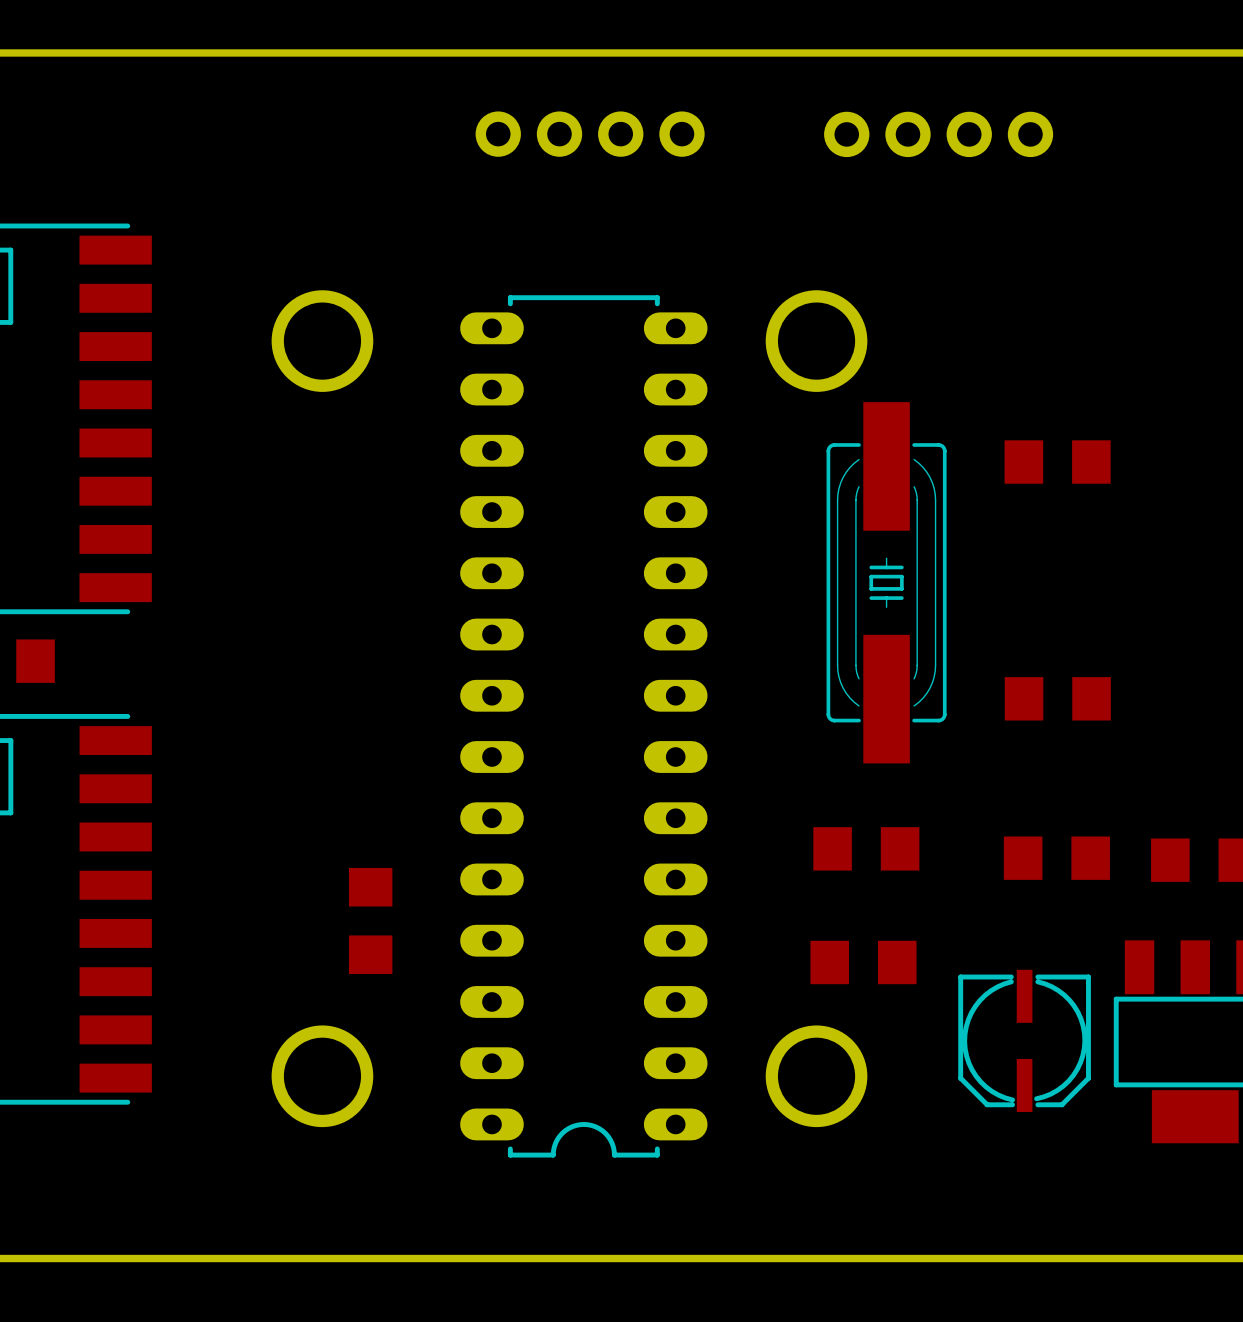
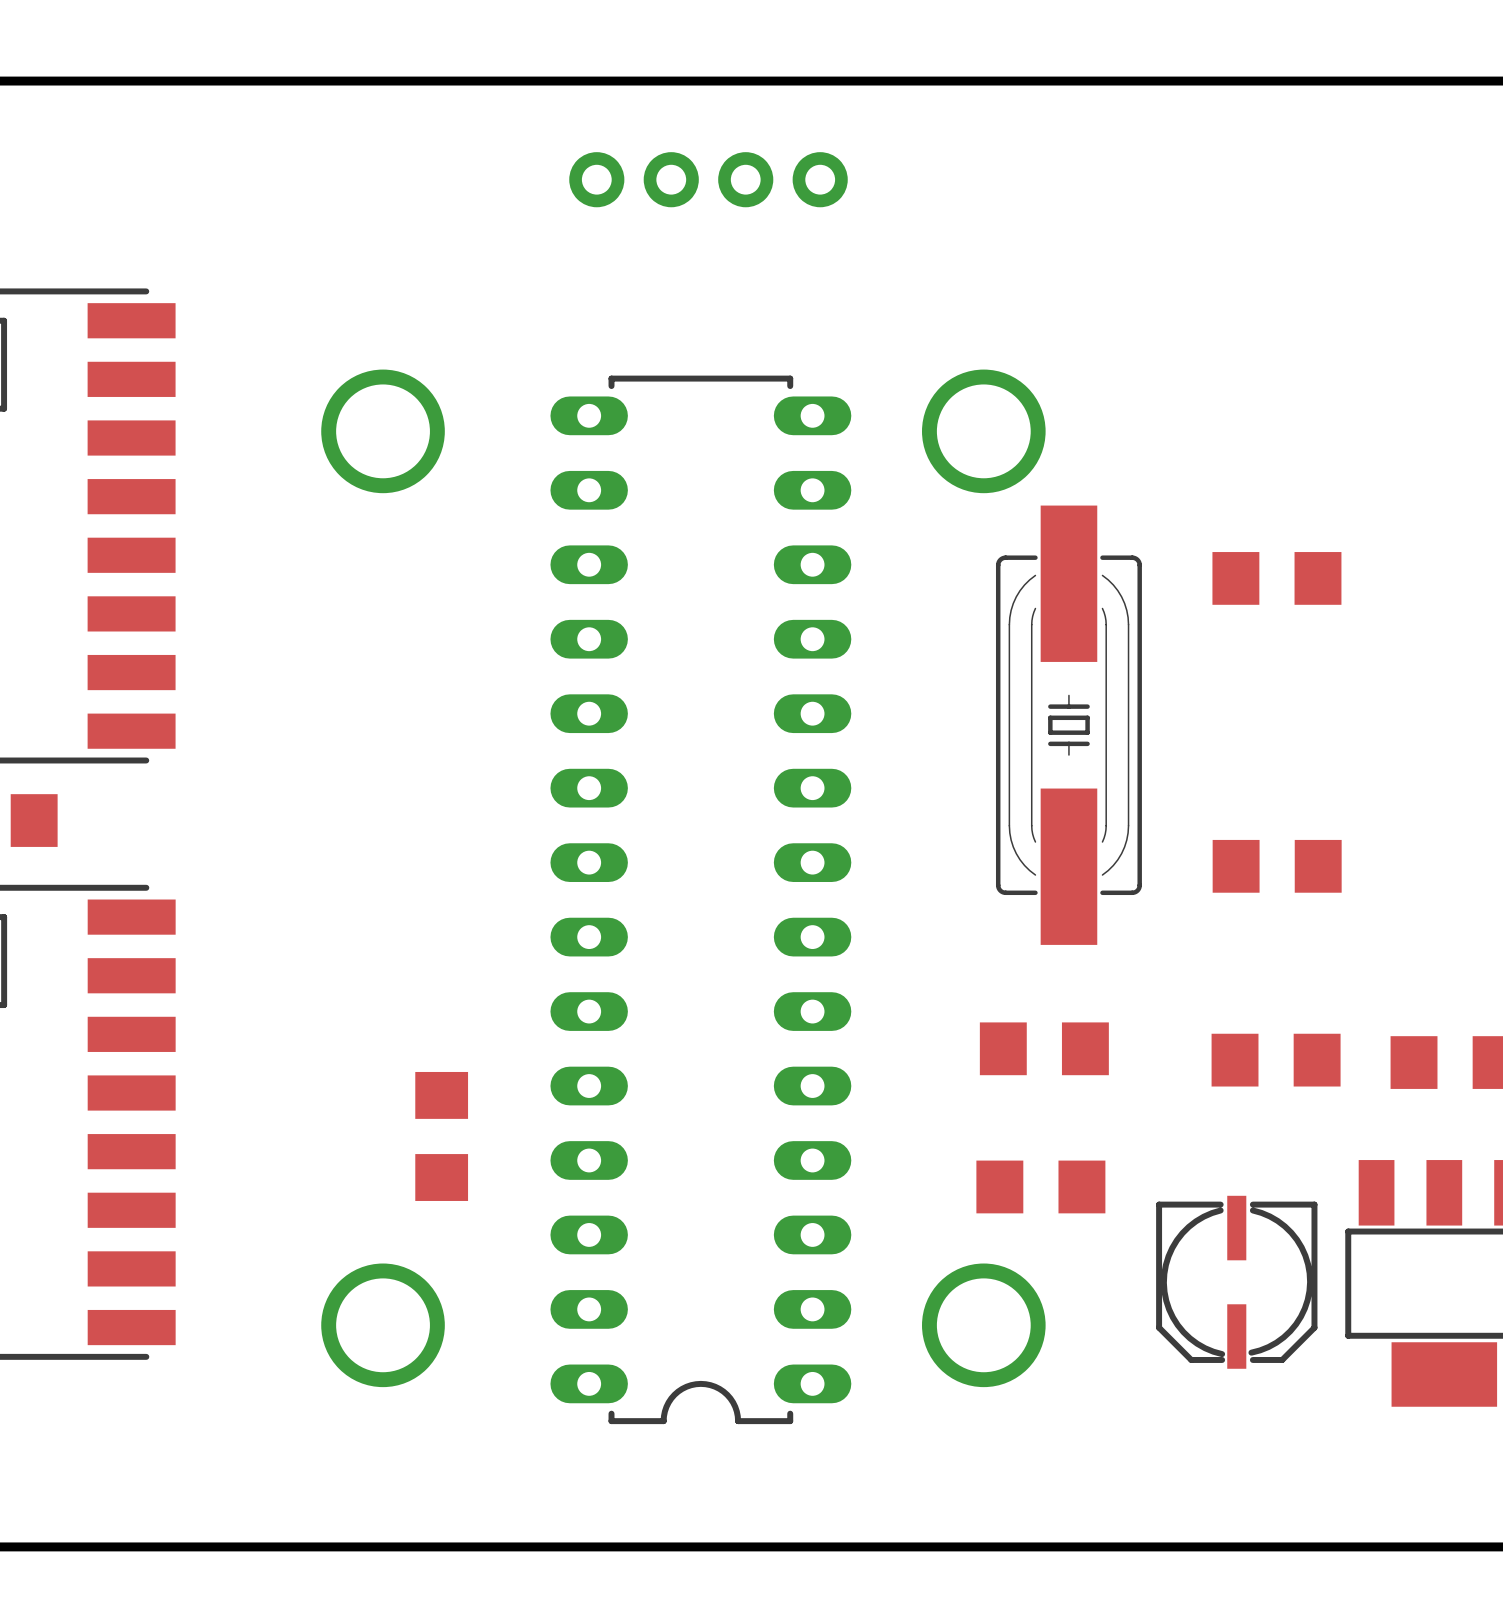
part: (938, 134) -> none

